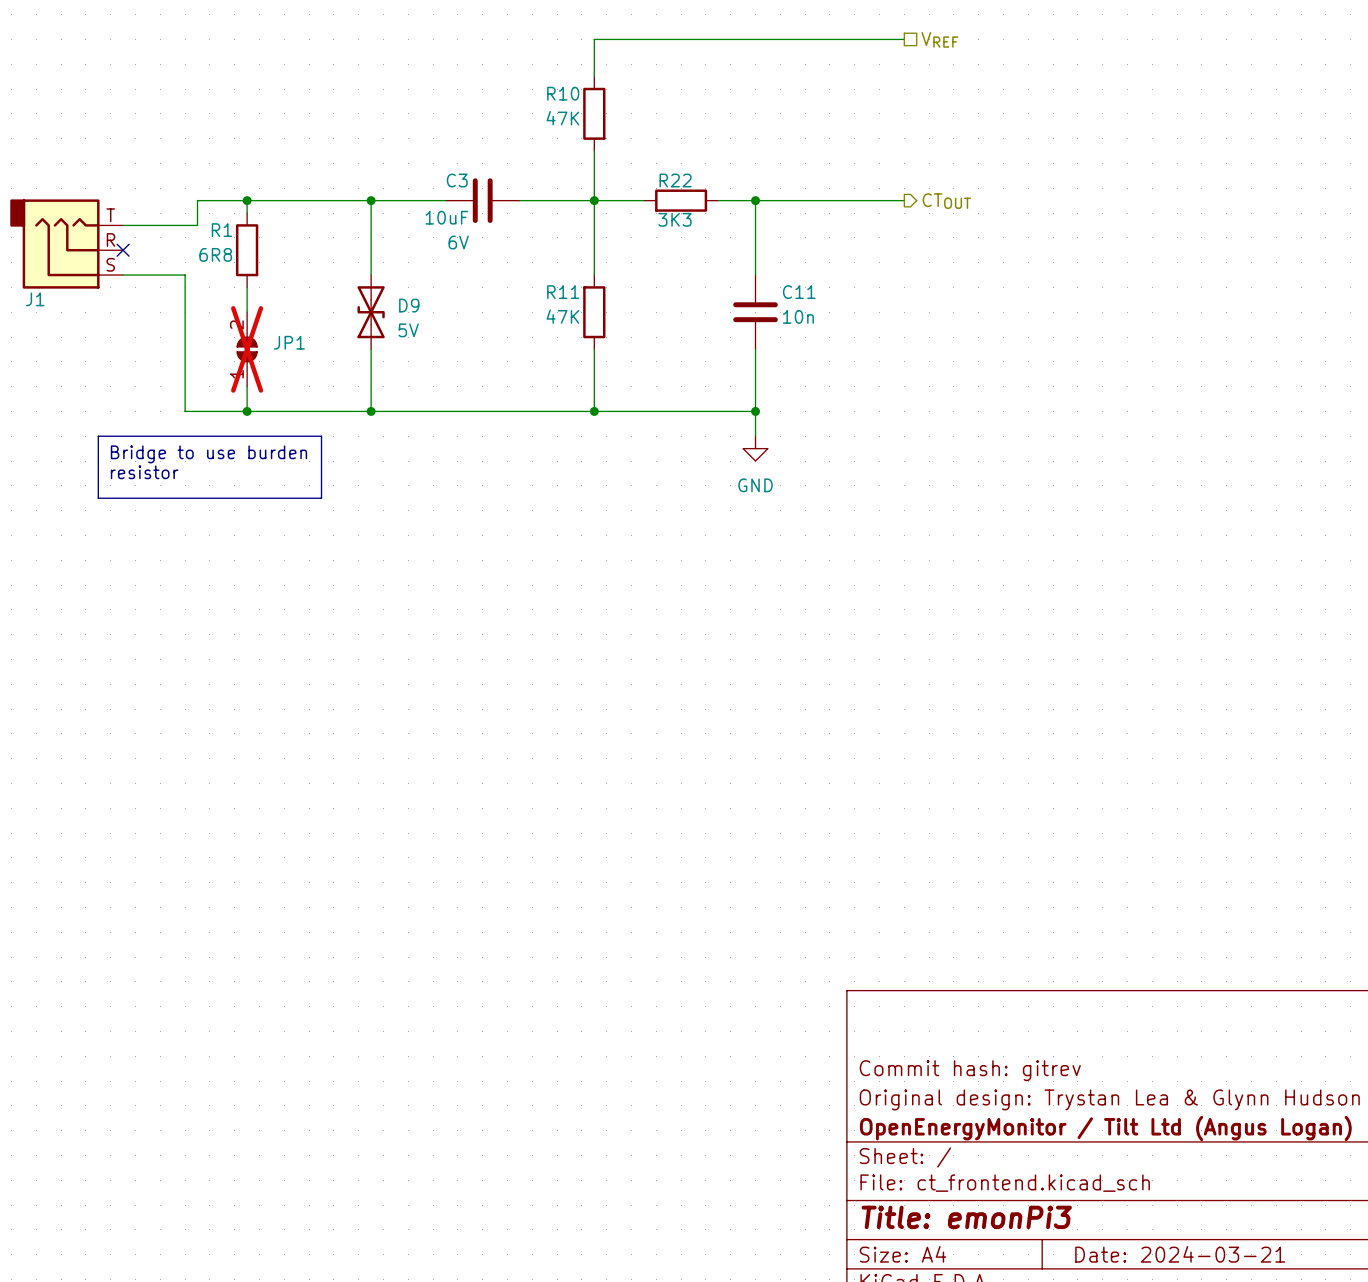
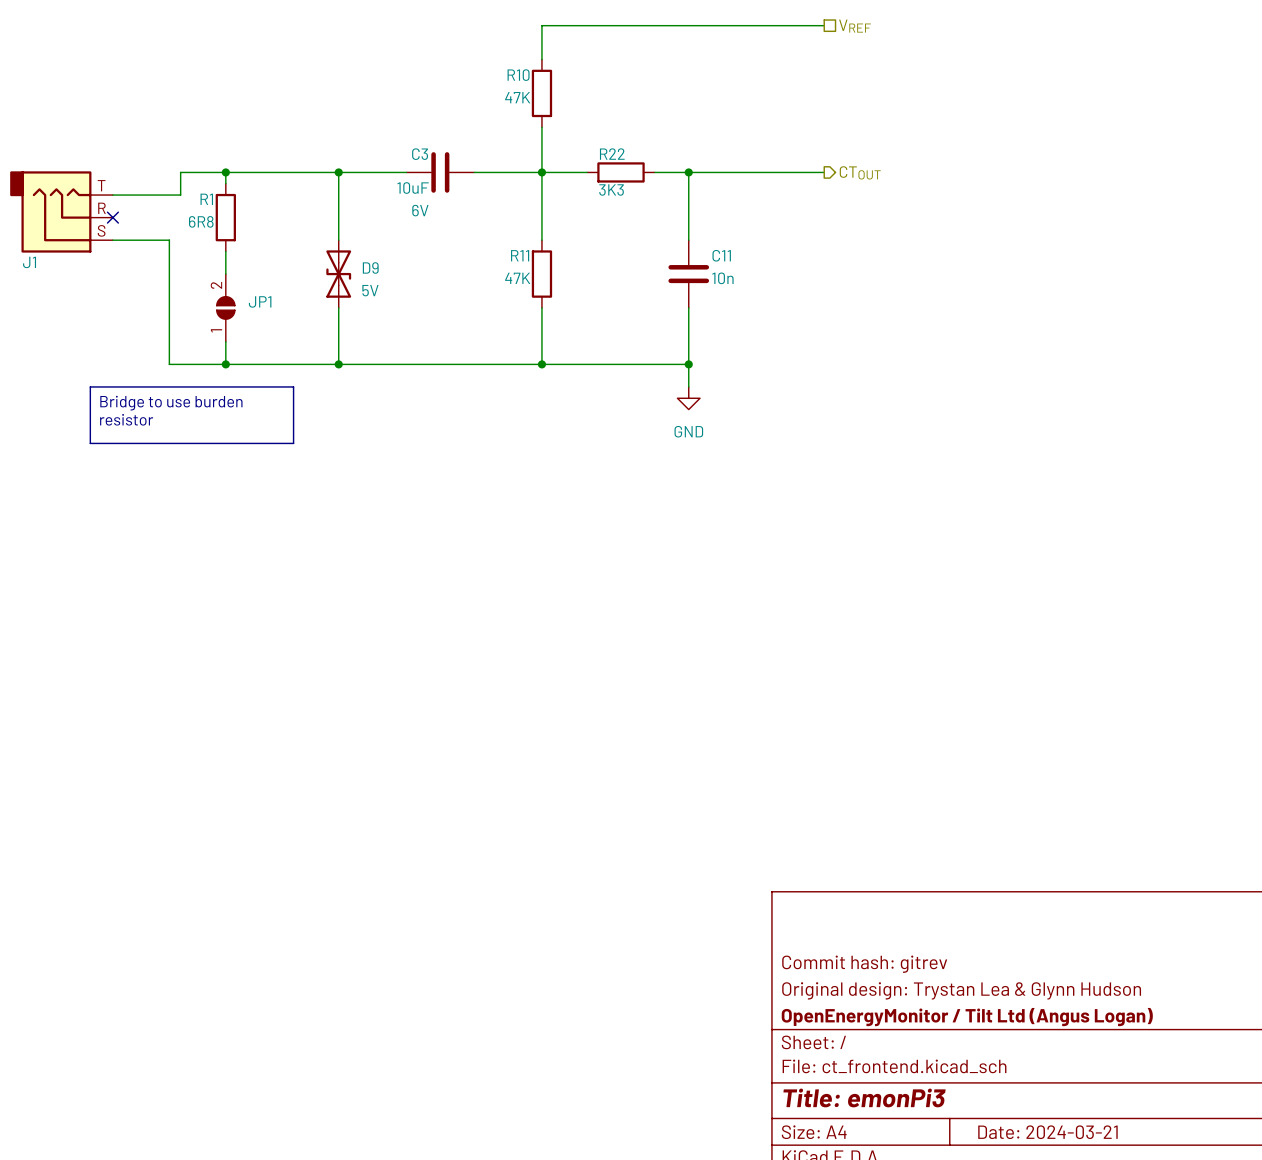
JP1 do-not-place cross: (247, 349) -> none

